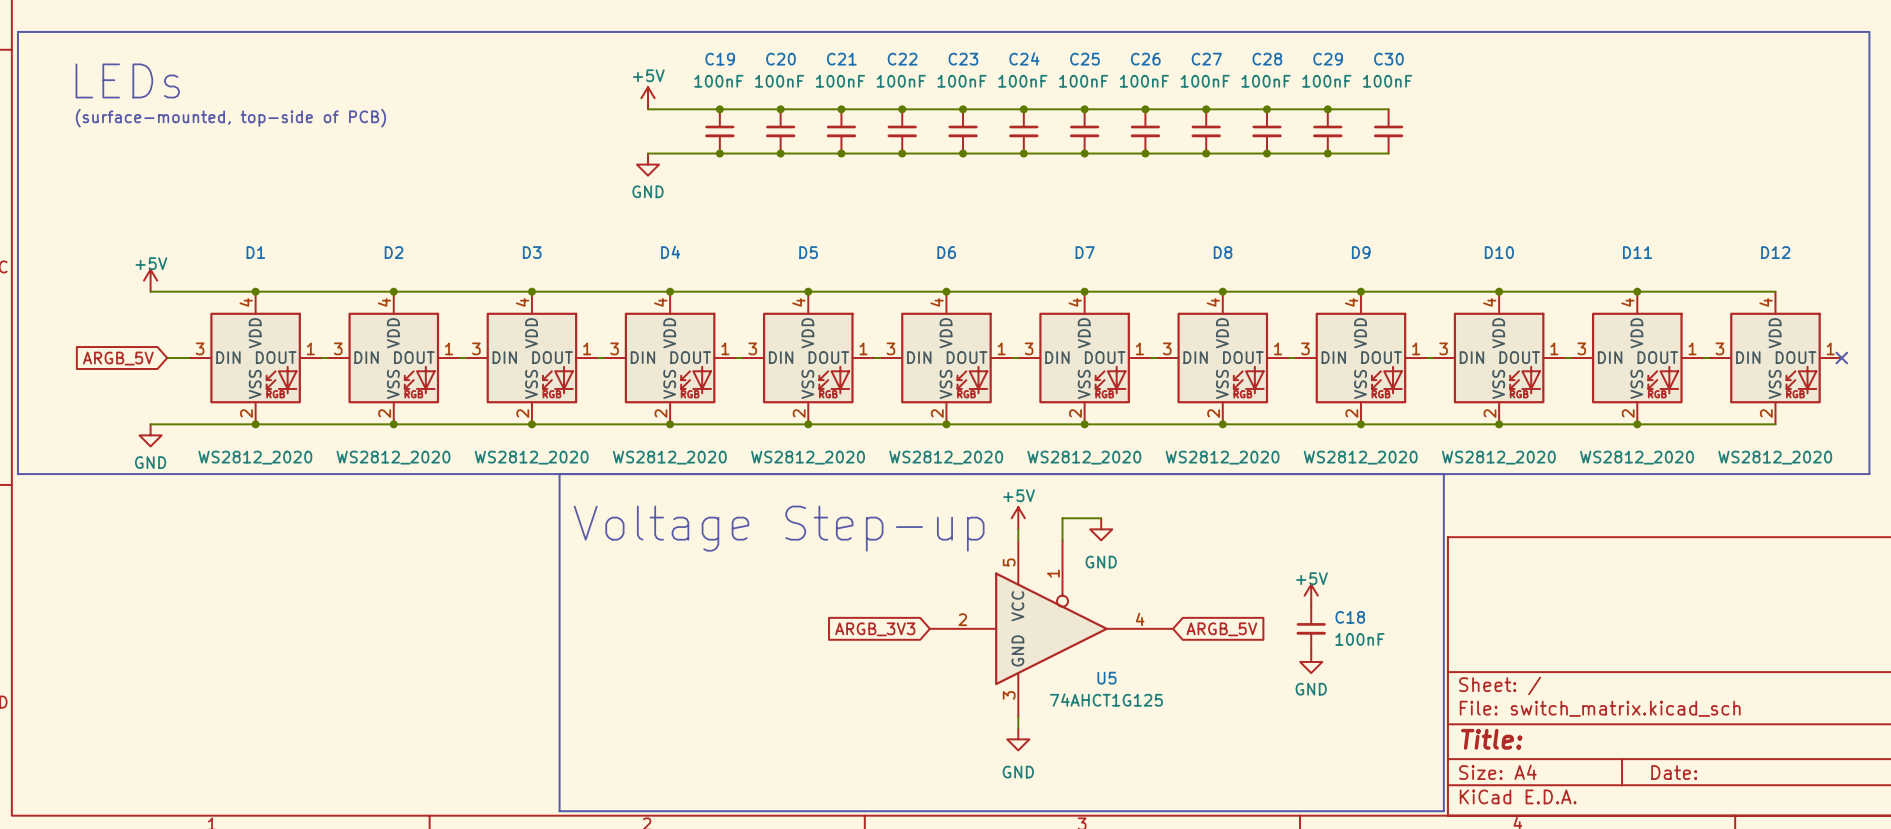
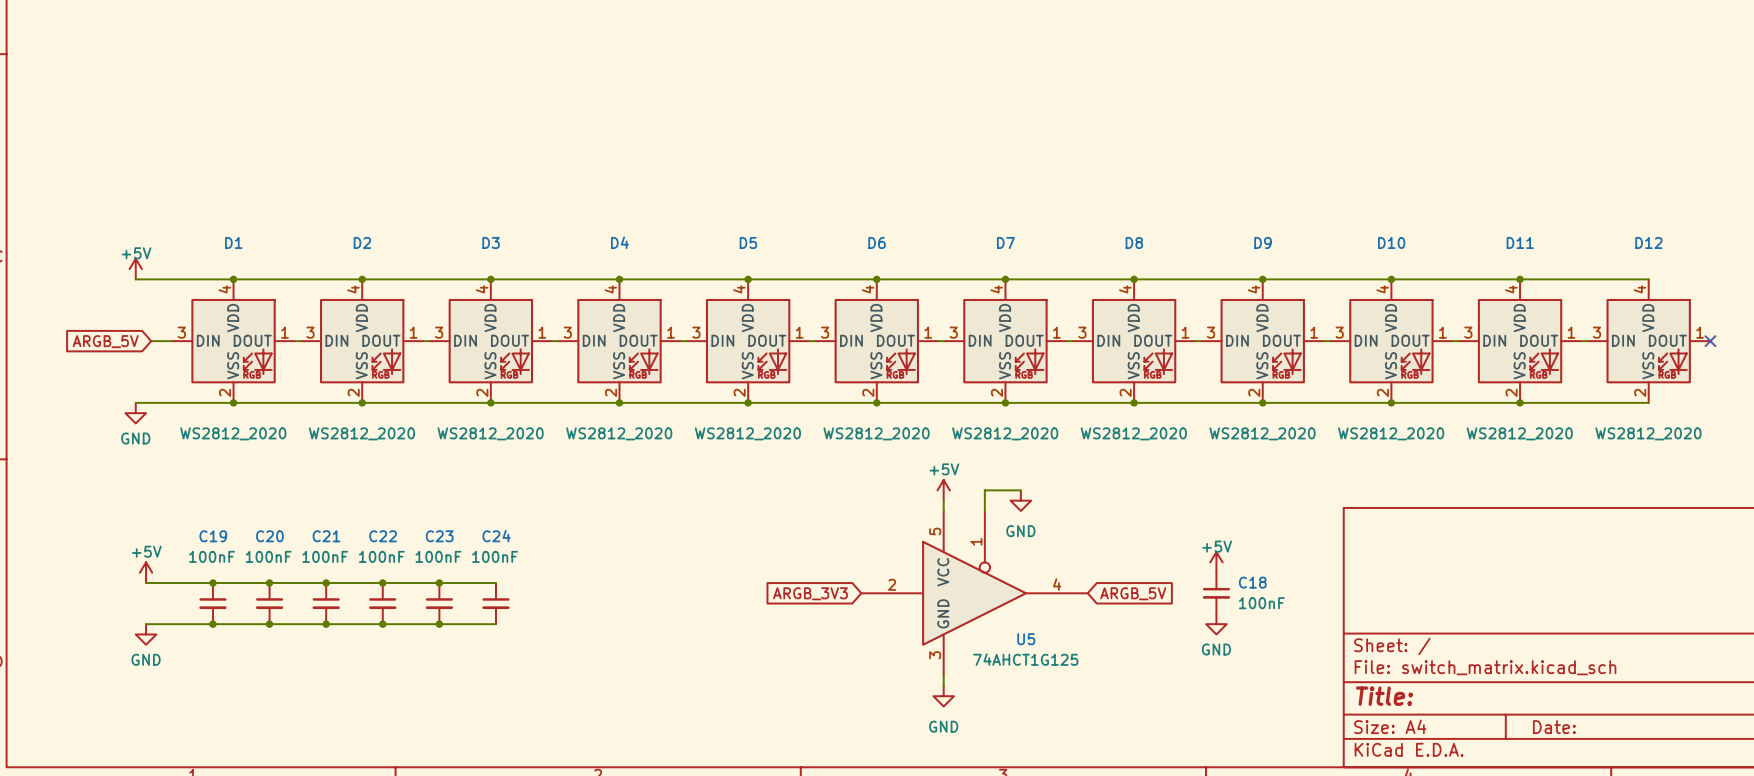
line: (17, 31) (1869, 31) (1869, 474) (17, 474) (17, 31) -> none
text: LEDs (127, 80) -> none
power symbol: +5V (648, 98) -> none
wire: (648, 109) (1388, 109) -> none
junction: (719, 109) -> none
junction: (780, 109) -> none
junction: (841, 109) -> none
junction: (902, 109) -> none
junction: (963, 109) -> none
junction: (1023, 109) -> none
junction: (1084, 109) -> none
junction: (1145, 109) -> none
junction: (1206, 109) -> none
junction: (1267, 109) -> none
junction: (1327, 109) -> none
text: (surface-mounted, top-side of PCB) (230, 118) -> none
C19 position: (719, 131) -> (212, 603)
C20 position: (780, 131) -> (269, 603)
C21 position: (841, 131) -> (326, 603)
C22 position: (902, 131) -> (382, 603)
C23 position: (963, 131) -> (439, 603)
C24 position: (1023, 131) -> (495, 603)
C25: 100nF (1084, 131) -> none
C26: 100nF (1145, 131) -> none
C27: 100nF (1206, 131) -> none
C28: 100nF (1267, 131) -> none
C29: 100nF (1327, 131) -> none
C30: 100nF (1388, 131) -> none
wire: (648, 153) (1388, 153) -> none
junction: (719, 153) -> none
junction: (780, 153) -> none
junction: (841, 153) -> none
junction: (902, 153) -> none
junction: (963, 153) -> none
junction: (1023, 153) -> none
junction: (1084, 153) -> none
junction: (1145, 153) -> none
junction: (1206, 153) -> none
junction: (1267, 153) -> none
junction: (1327, 153) -> none
power symbol: GND (648, 164) -> none
line: (559, 474) (559, 811) (1443, 811) (1443, 474) -> none
text: Voltage Step-up (779, 528) -> none
power symbol: none -> +5V (146, 572)
wire: none -> (146, 582) (495, 582)
junction: none -> (212, 582)
junction: none -> (269, 582)
junction: none -> (326, 582)
junction: none -> (382, 582)
junction: none -> (439, 582)
wire: none -> (146, 624) (495, 624)
junction: none -> (212, 624)
junction: none -> (269, 624)
junction: none -> (326, 624)
junction: none -> (382, 624)
junction: none -> (439, 624)
power symbol: none -> GND (146, 634)

